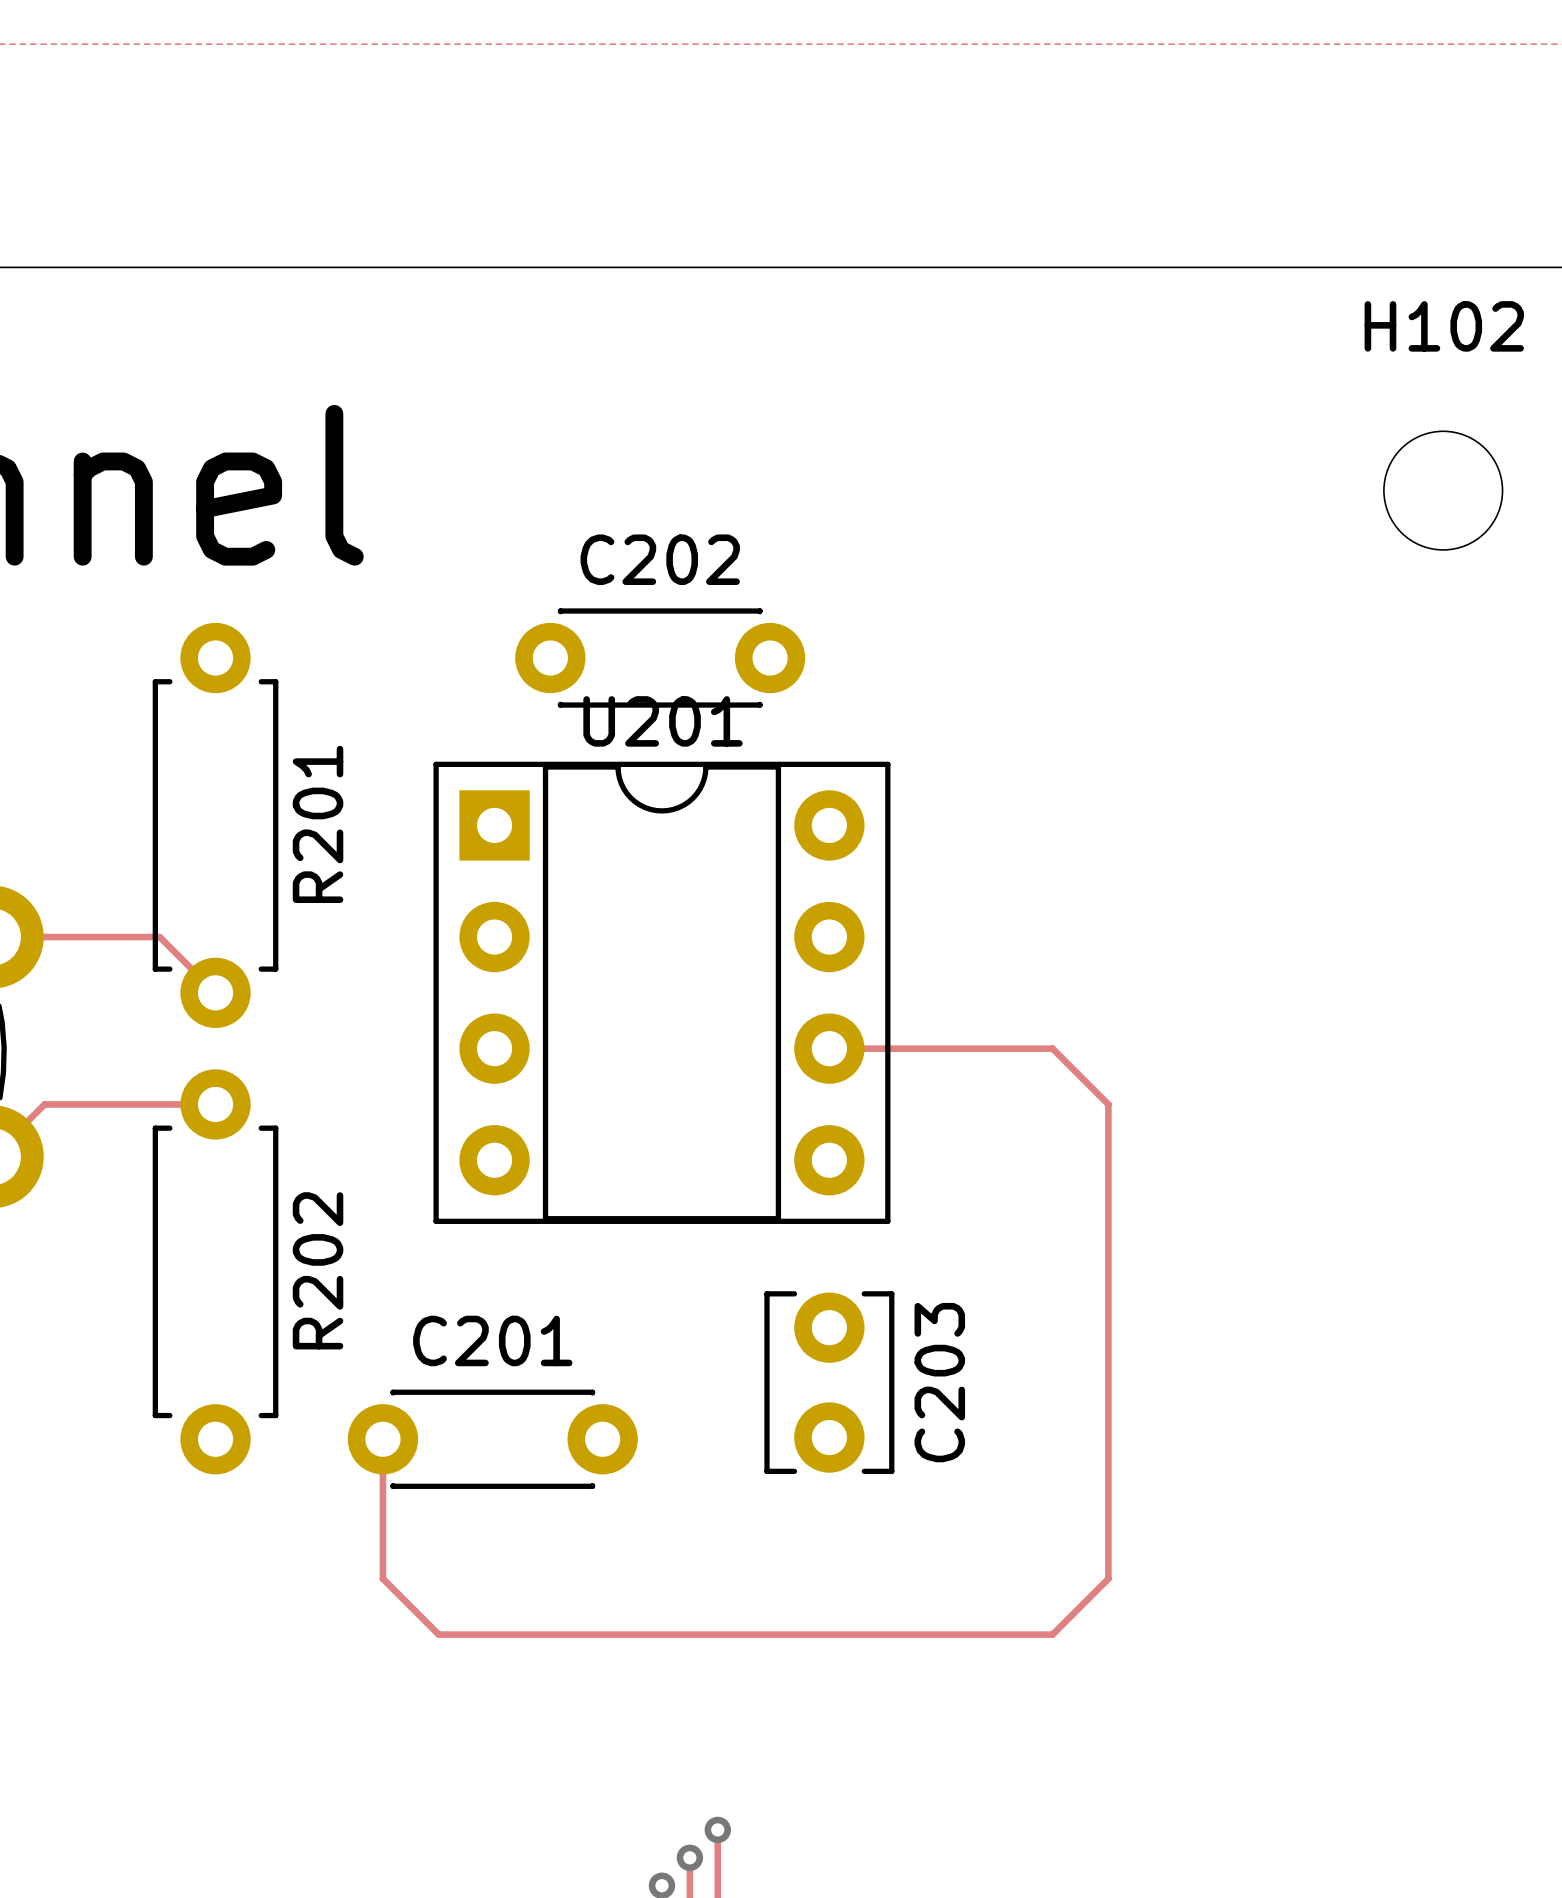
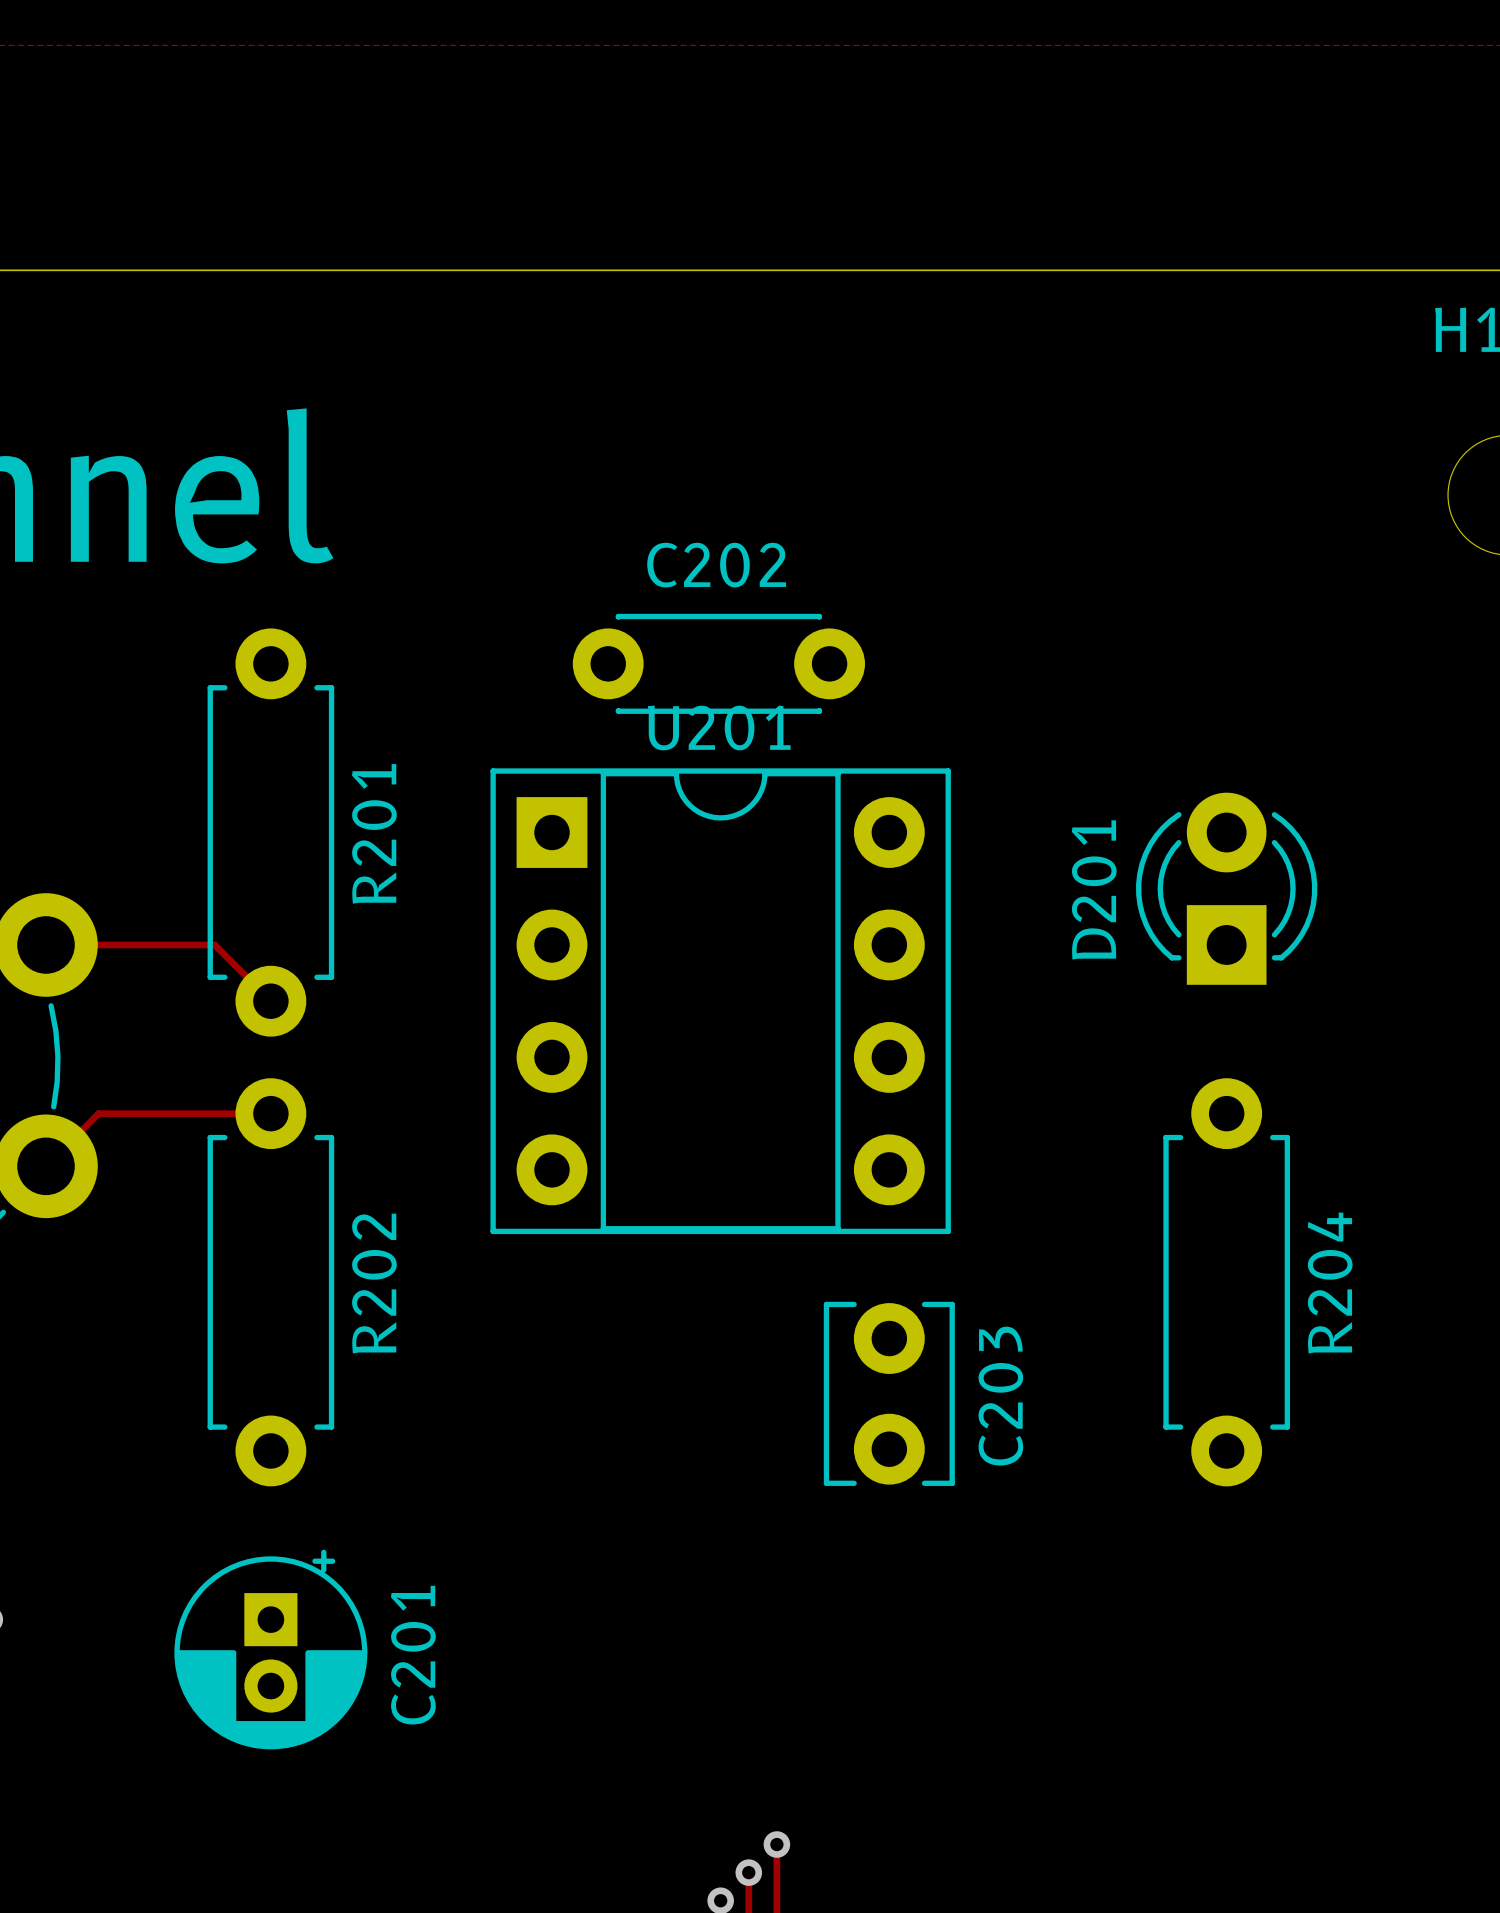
D201: none -> (1226, 888)
track: (829, 1048) (1052, 1048) (1108, 1104) (1108, 1578) (1052, 1634) (438, 1634) (382, 1578) (382, 1439) -> none
R204: none -> (1226, 1282)
C201 name position: C201 (492, 1340) -> C201 (413, 1655)
C201 footprint: [347, 1389, 638, 1489] -> [174, 1549, 368, 1750]

